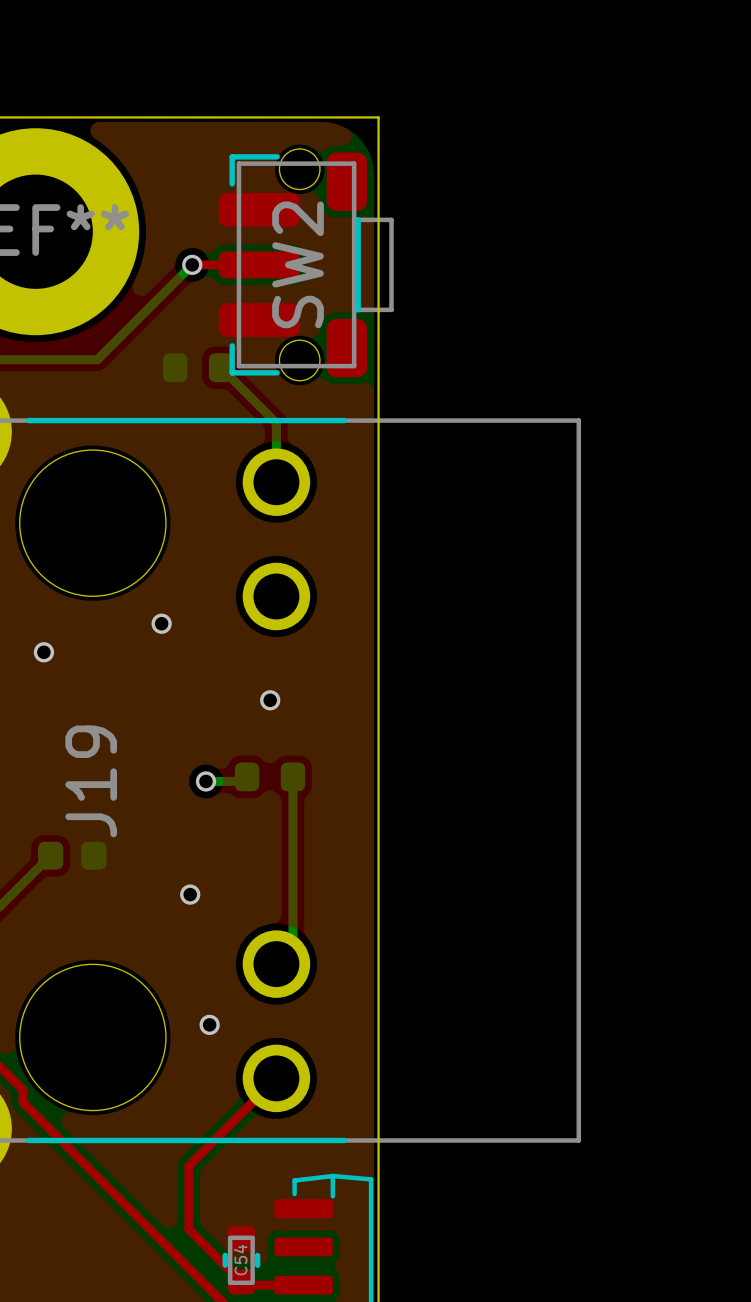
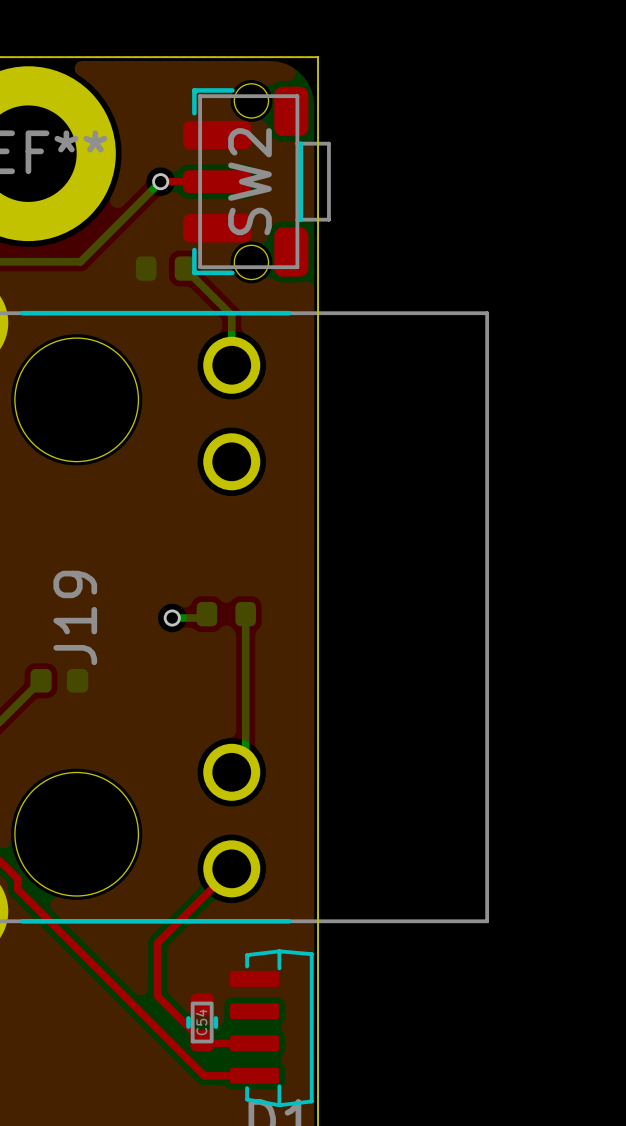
via: (161, 623) -> none
via: (43, 652) -> none
via: (270, 700) -> none
via: (190, 894) -> none
via: (209, 1024) -> none

